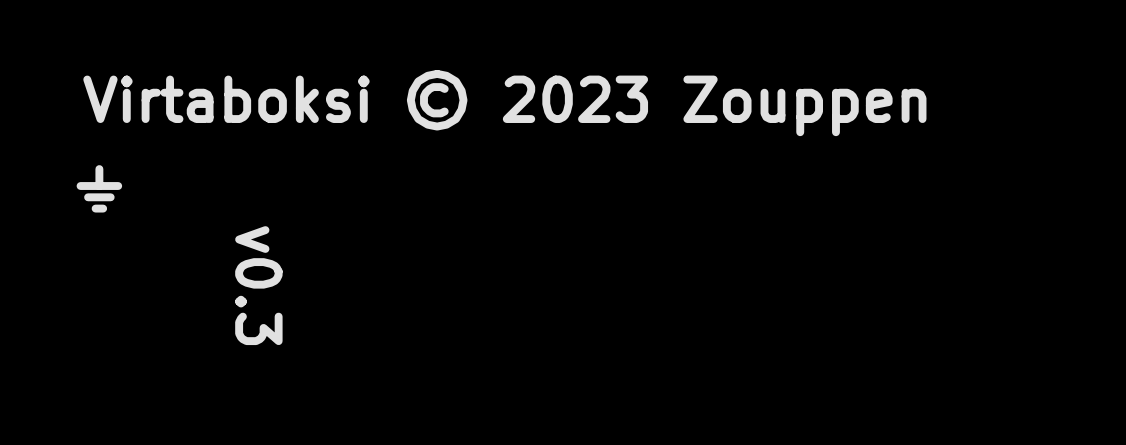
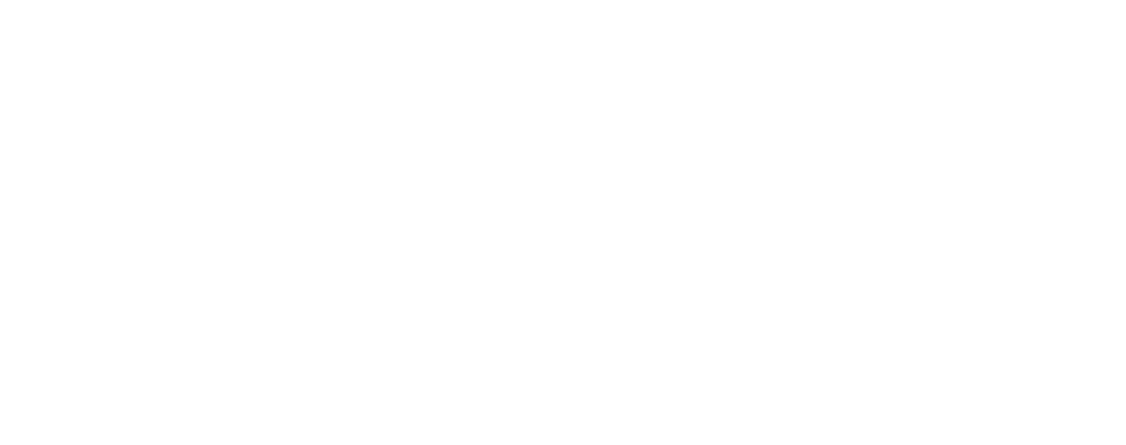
text: Virtaboksi © 2023 Zouppen (504, 103) -> none
text: ⏚ (99, 188) -> none
text: v0.3 (258, 285) -> none

